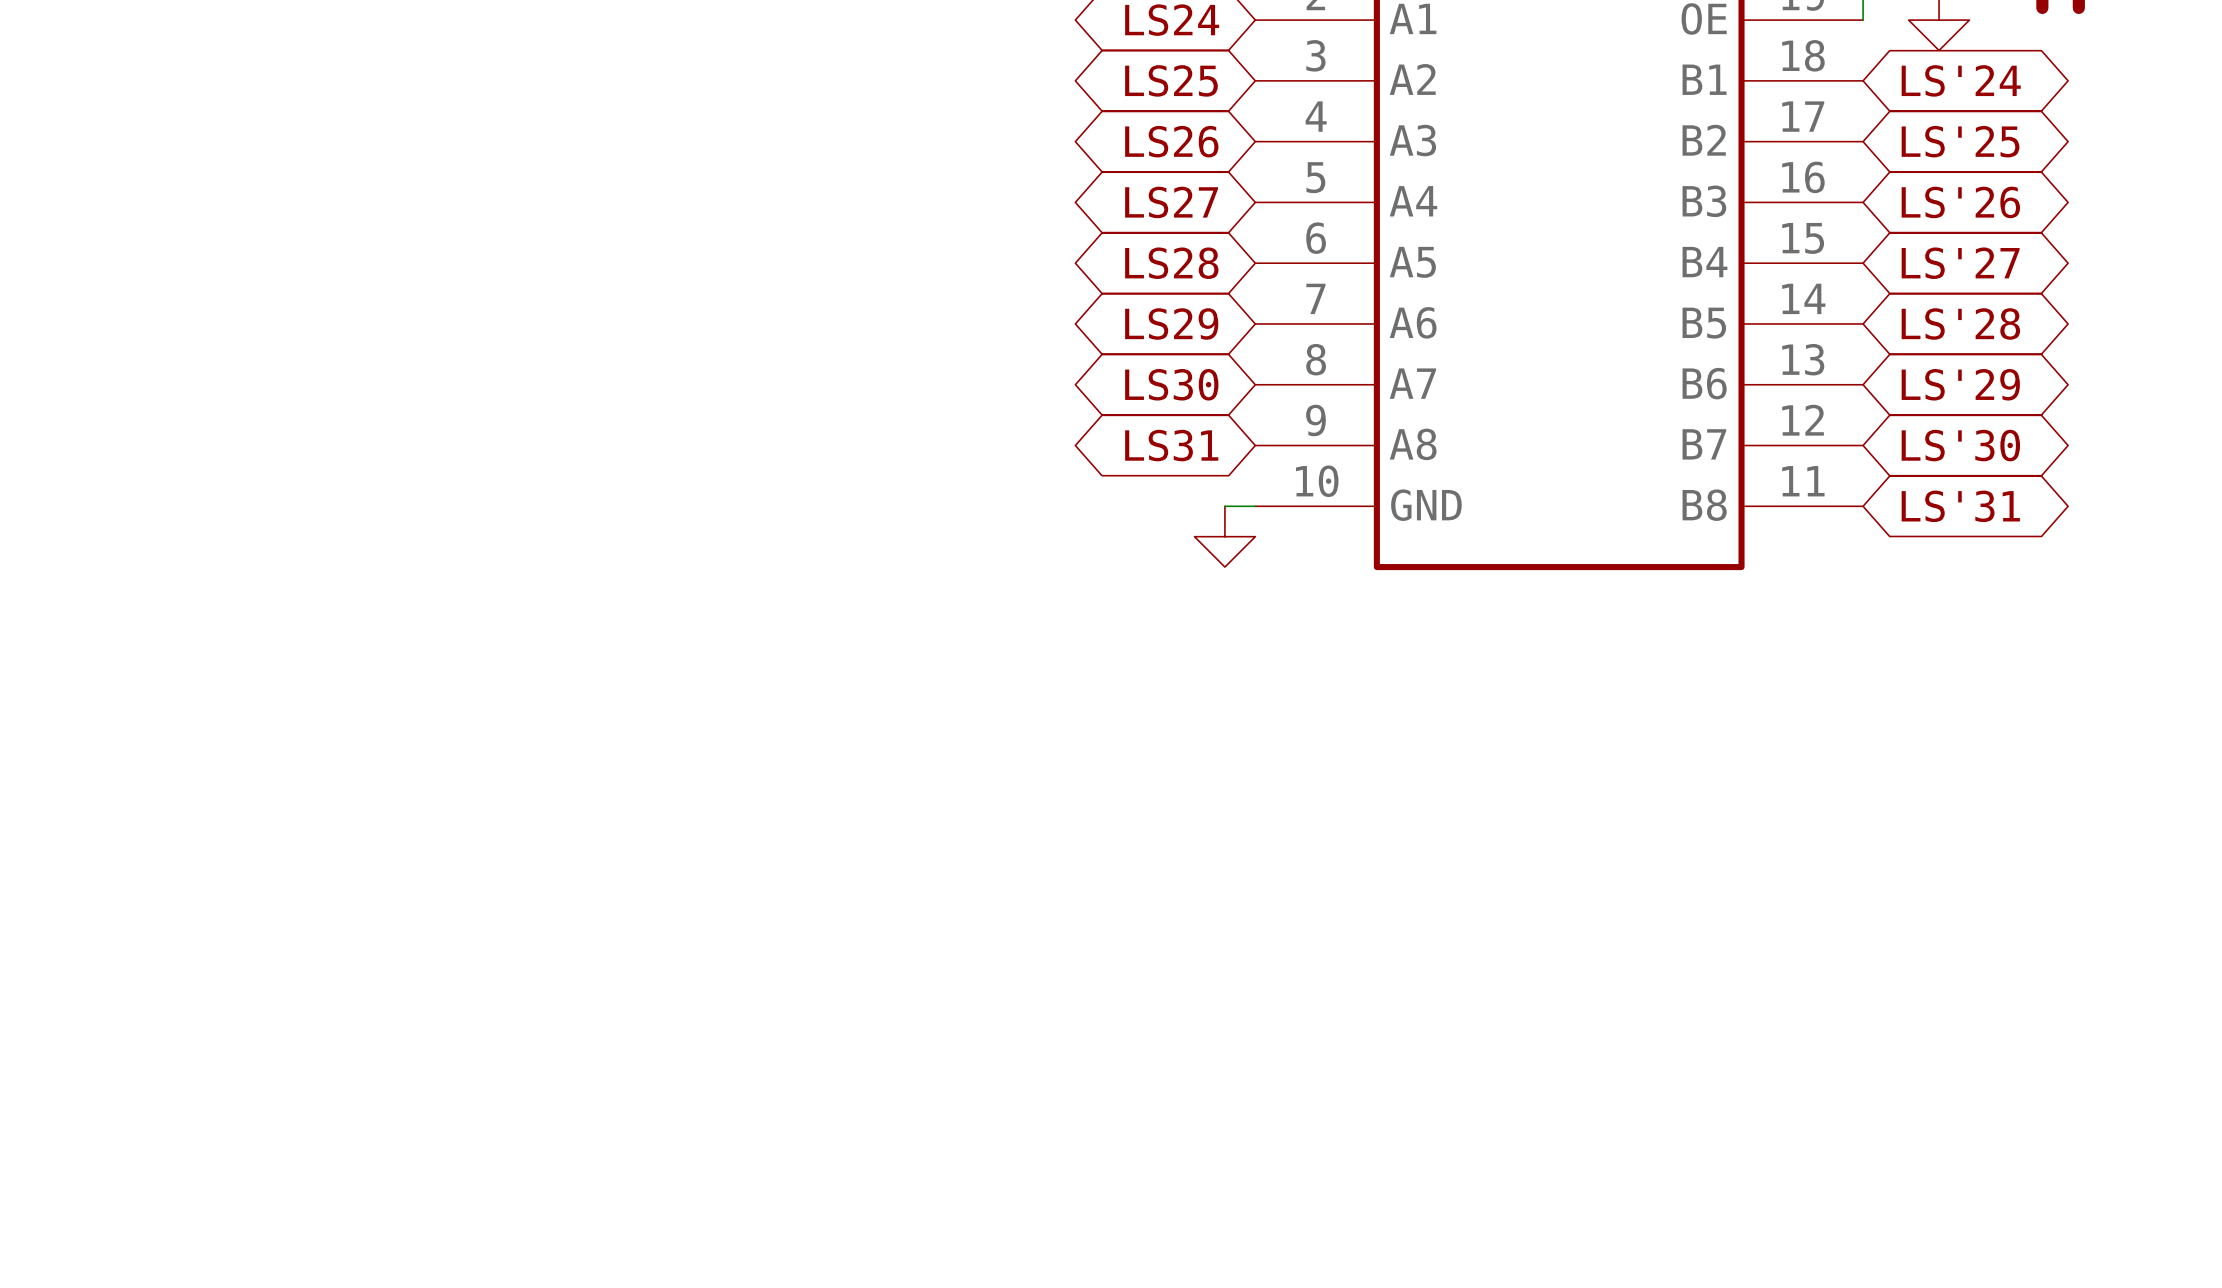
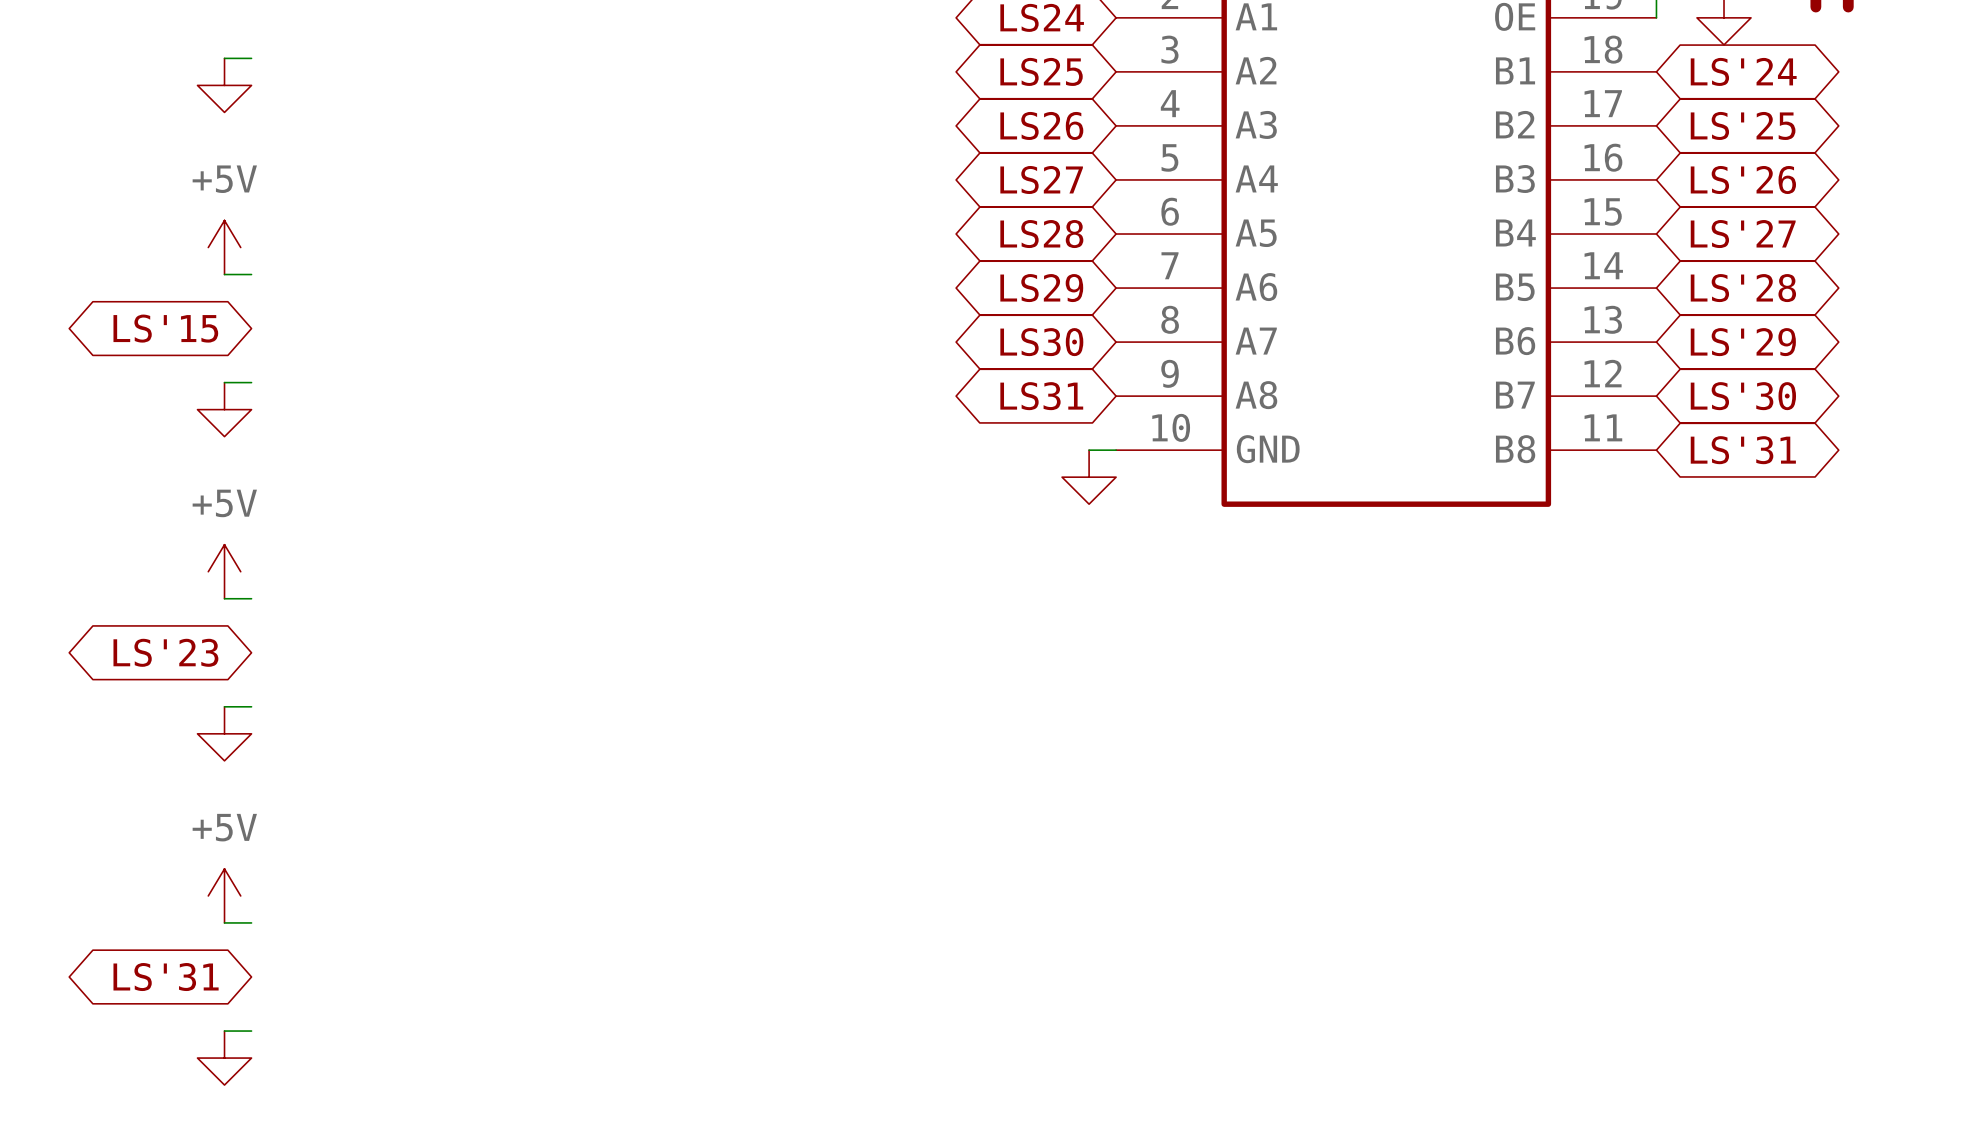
wire: none -> (224, 58) (251, 58)
power symbol: none -> (224, 85)
power symbol: none -> +5V (224, 247)
wire: none -> (224, 274) (251, 274)
global label: none -> LS'15 (165, 328)
wire: none -> (224, 382) (251, 382)
power symbol: none -> (224, 409)
power symbol: none -> +5V (224, 571)
wire: none -> (224, 598) (251, 598)
global label: none -> LS'23 (165, 652)
wire: none -> (224, 706) (251, 706)
power symbol: none -> (224, 733)
power symbol: none -> +5V (224, 895)
wire: none -> (224, 922) (251, 922)
global label: none -> LS'31 (166, 977)
wire: none -> (224, 1031) (251, 1031)
power symbol: none -> (224, 1058)

